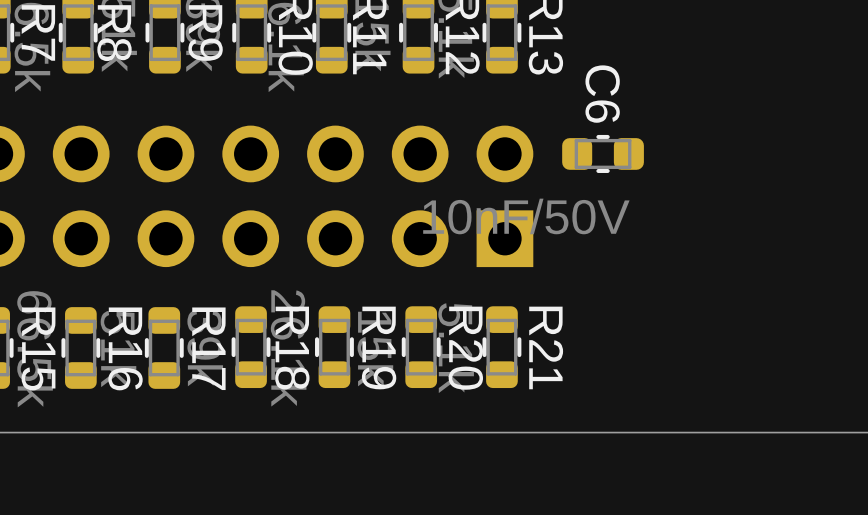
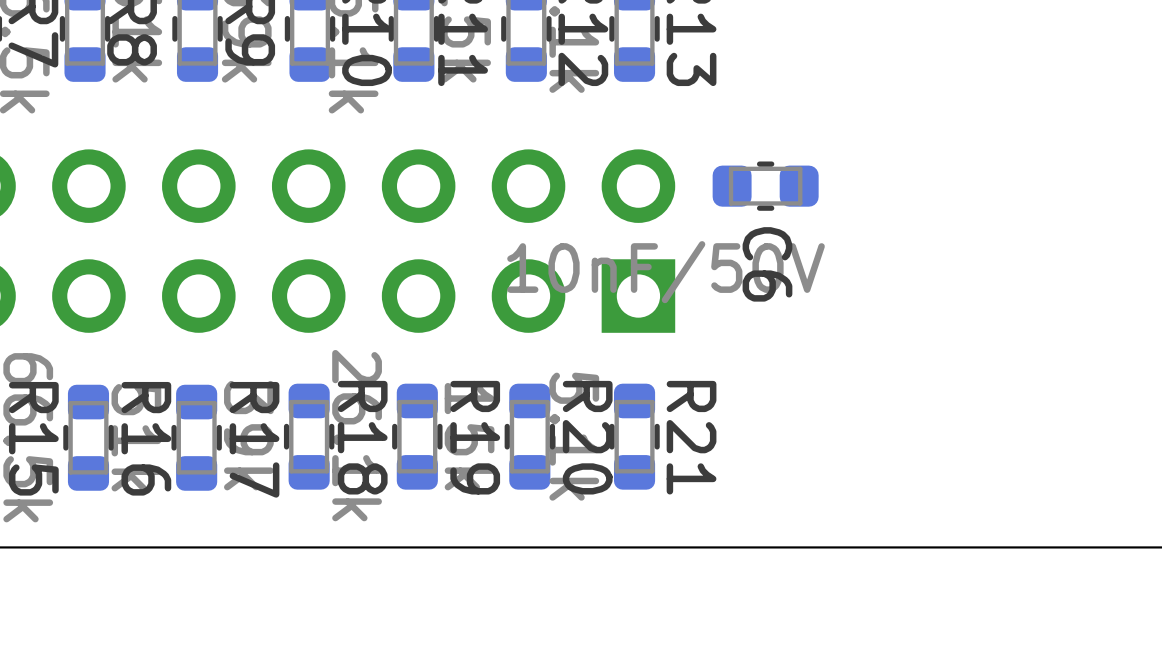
C6 name position: C6 (602, 94) -> C6 (767, 264)

